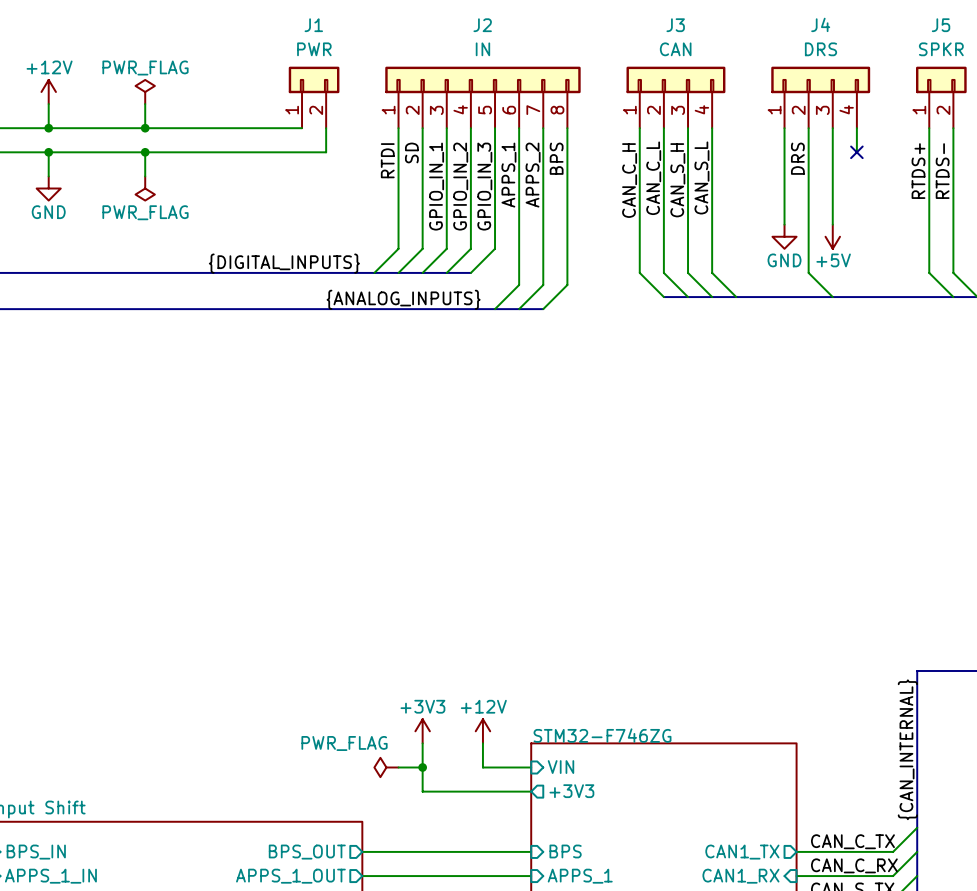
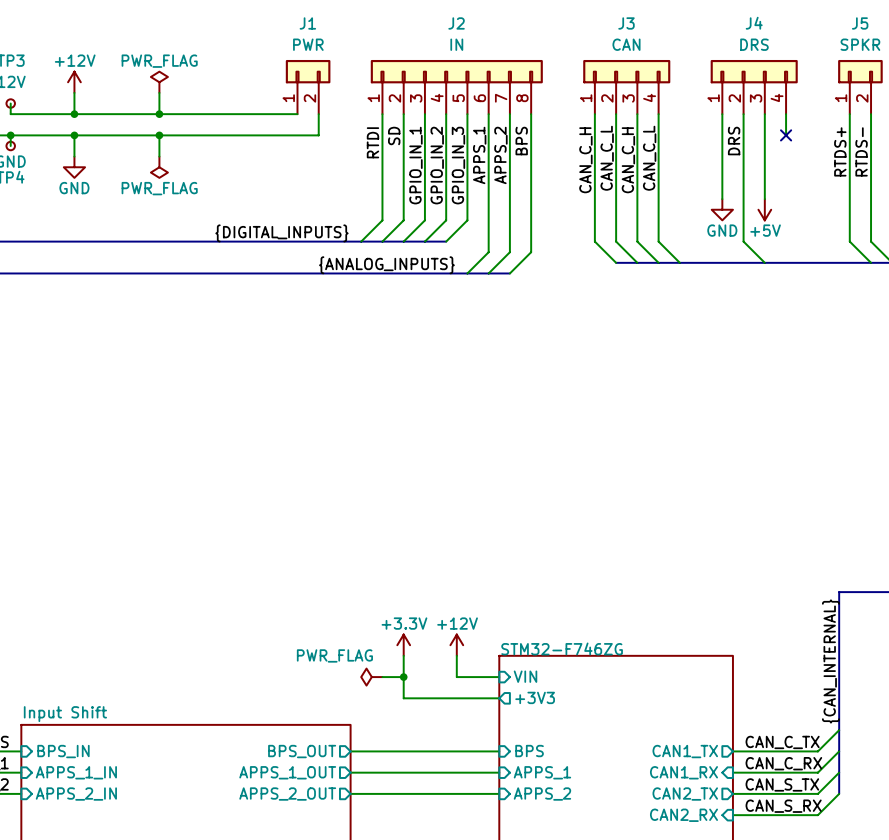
label: CAN_S_L (701, 177) -> CAN_C_L (649, 158)
label: CAN_S_H (677, 180) -> CAN_C_H (628, 160)
power symbol: +3V3 (422, 731) -> +3.3V (403, 645)

